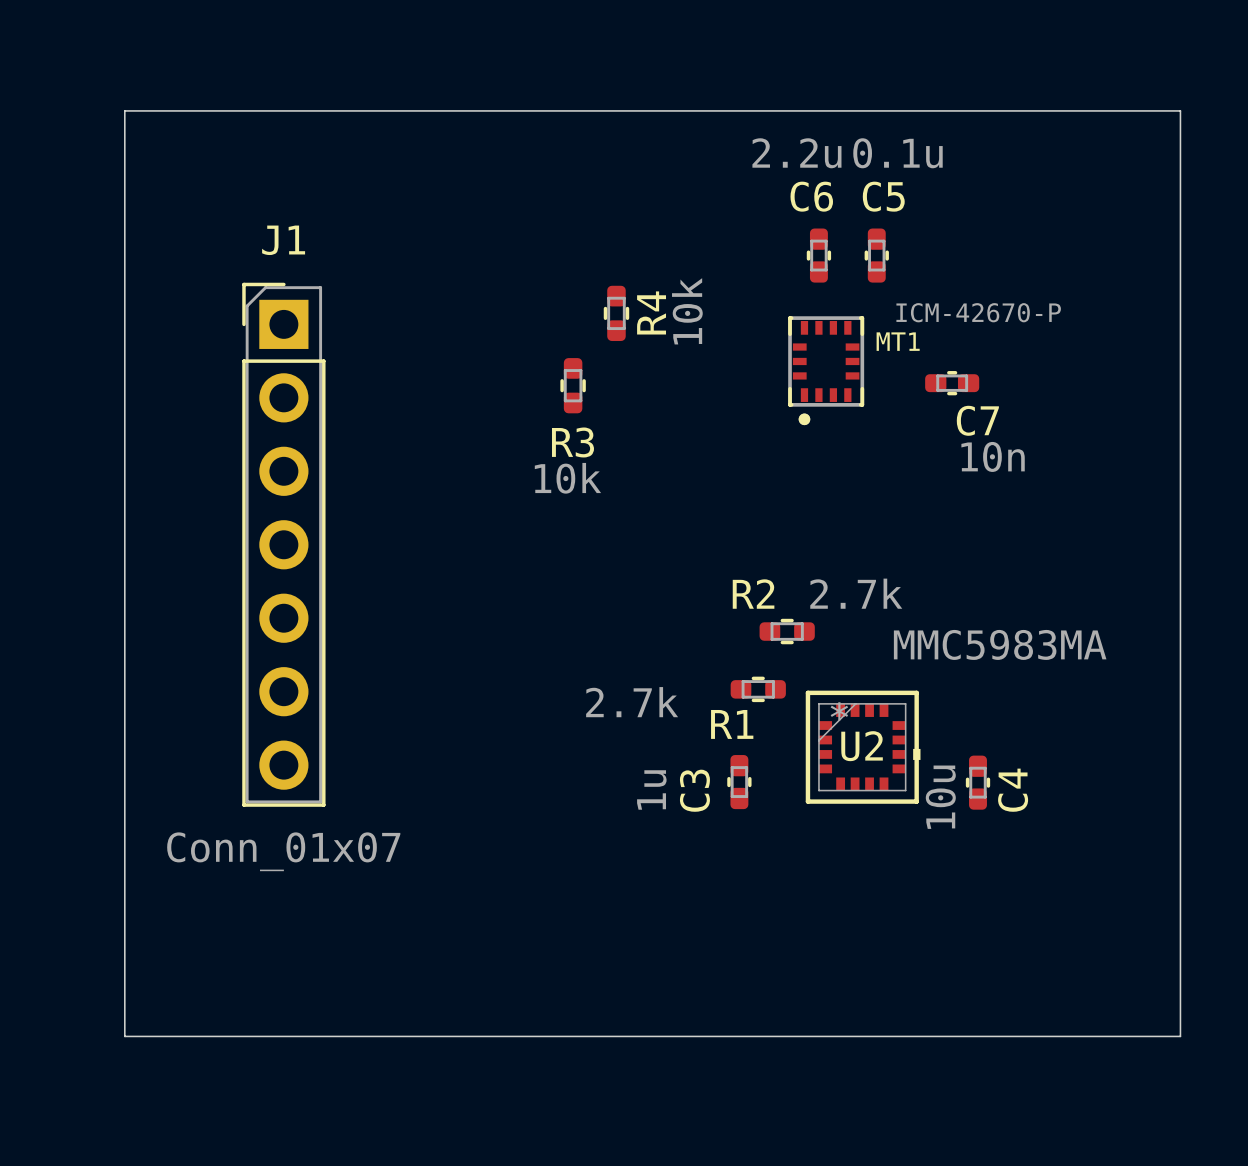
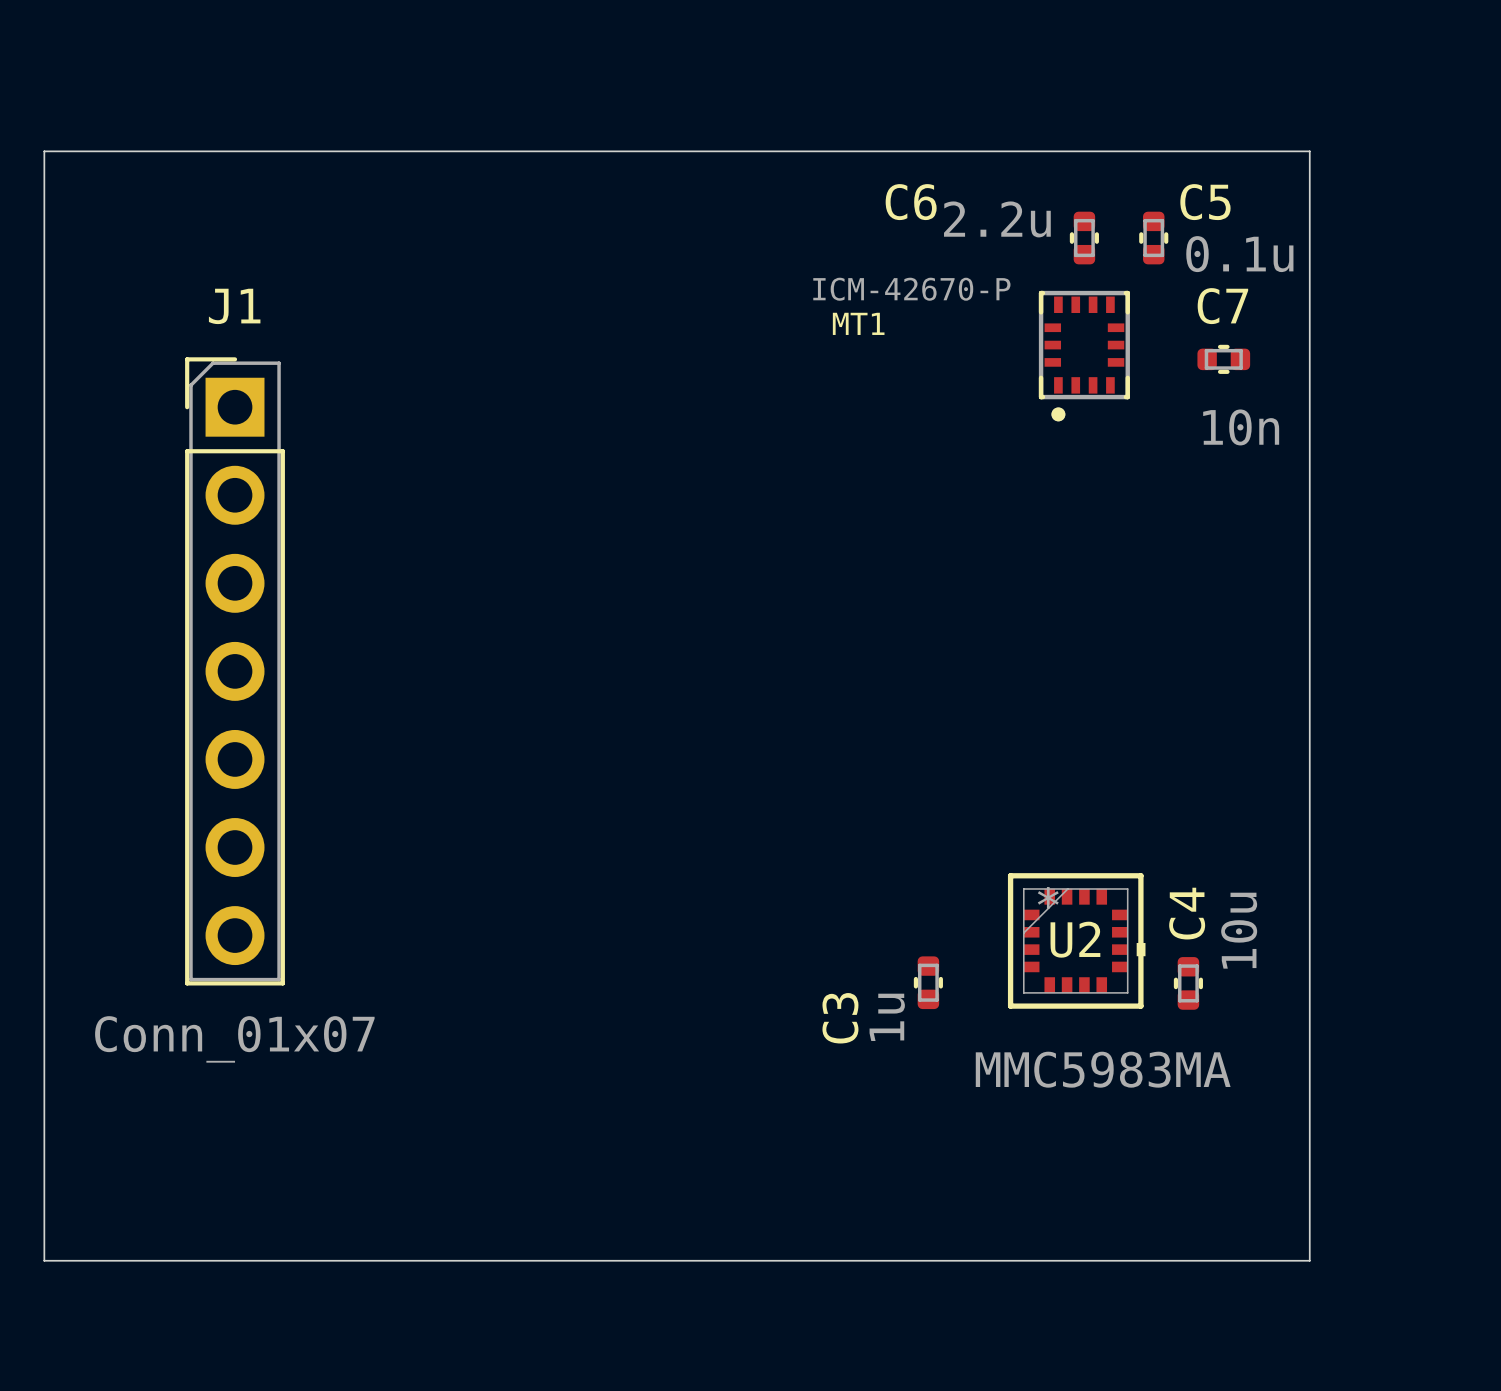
C6 value position: 2.2u (796, 153) -> 2.2u (997, 219)
C5 value position: 0.1u (897, 153) -> 0.1u (1239, 254)
C6 name position: C6 (811, 196) -> C6 (911, 202)
C6 footprint: [806, 228, 832, 283] -> [1069, 211, 1099, 265]
C5 footprint: [864, 228, 889, 283] -> [1139, 211, 1169, 265]
MT1 value position: ICM-42670-P (978, 312) -> ICM-42670-P (911, 289)
R4: 10k (616, 313) -> none
MT1 name position: MT1 (898, 341) -> MT1 (858, 323)
MT1 position: (826, 370) -> (1084, 356)
C7 footprint: [925, 371, 980, 396] -> [1197, 344, 1251, 374]
R3: 10k (573, 385) -> none
C7 name position: C7 (977, 420) -> C7 (1222, 306)
R2: 2.7k (787, 631) -> none
U2 value position: MMC5983MA (1000, 644) -> MMC5983MA (1103, 1069)
R1: 2.7k (758, 689) -> none
U2 position: (863, 747) -> (1076, 940)
C3 footprint: [727, 755, 752, 810] -> [913, 956, 943, 1010]
C4 footprint: [965, 755, 991, 810] -> [1173, 957, 1203, 1010]
C4 name position: C4 (1013, 790) -> C4 (1187, 913)
C4 value position: 10u (940, 797) -> 10u (1239, 930)

